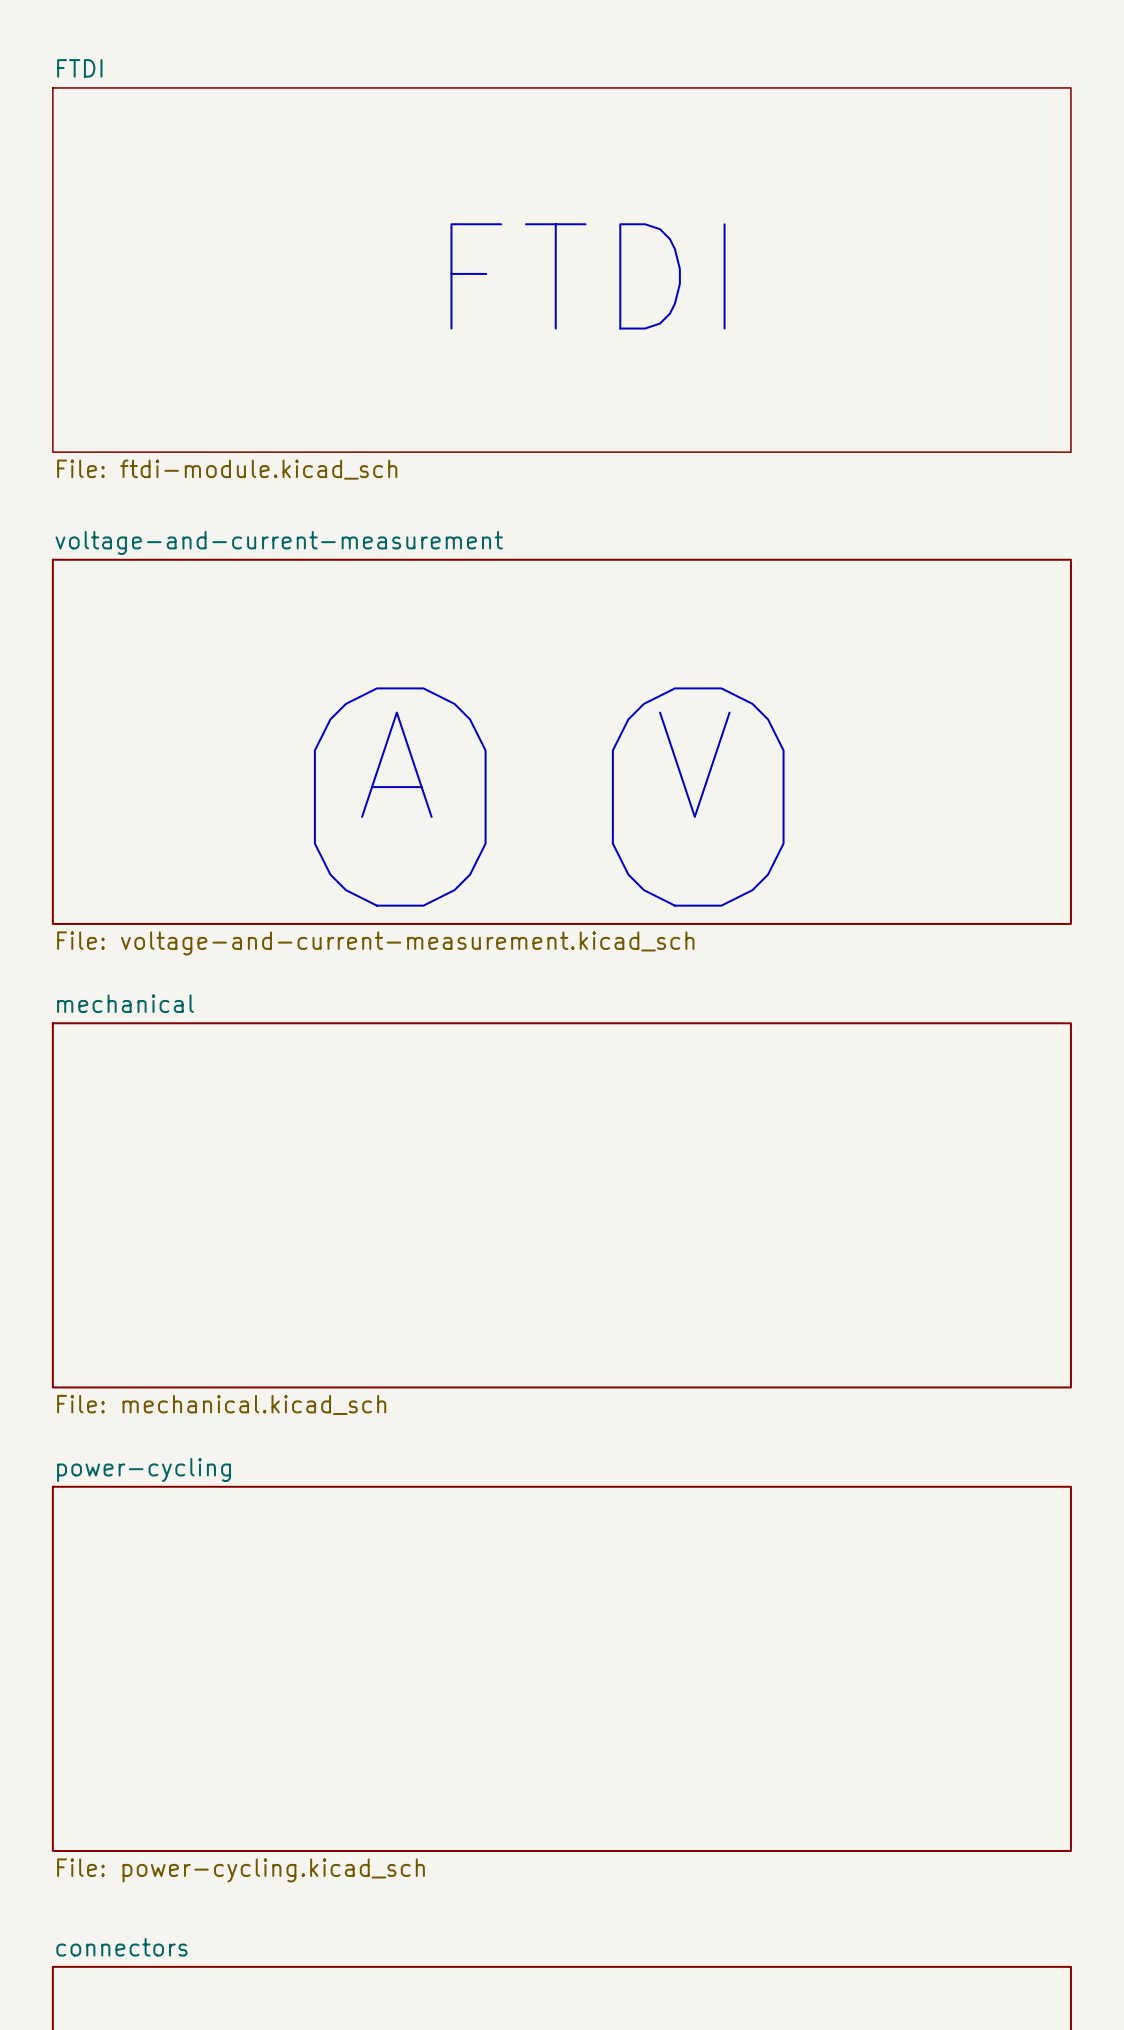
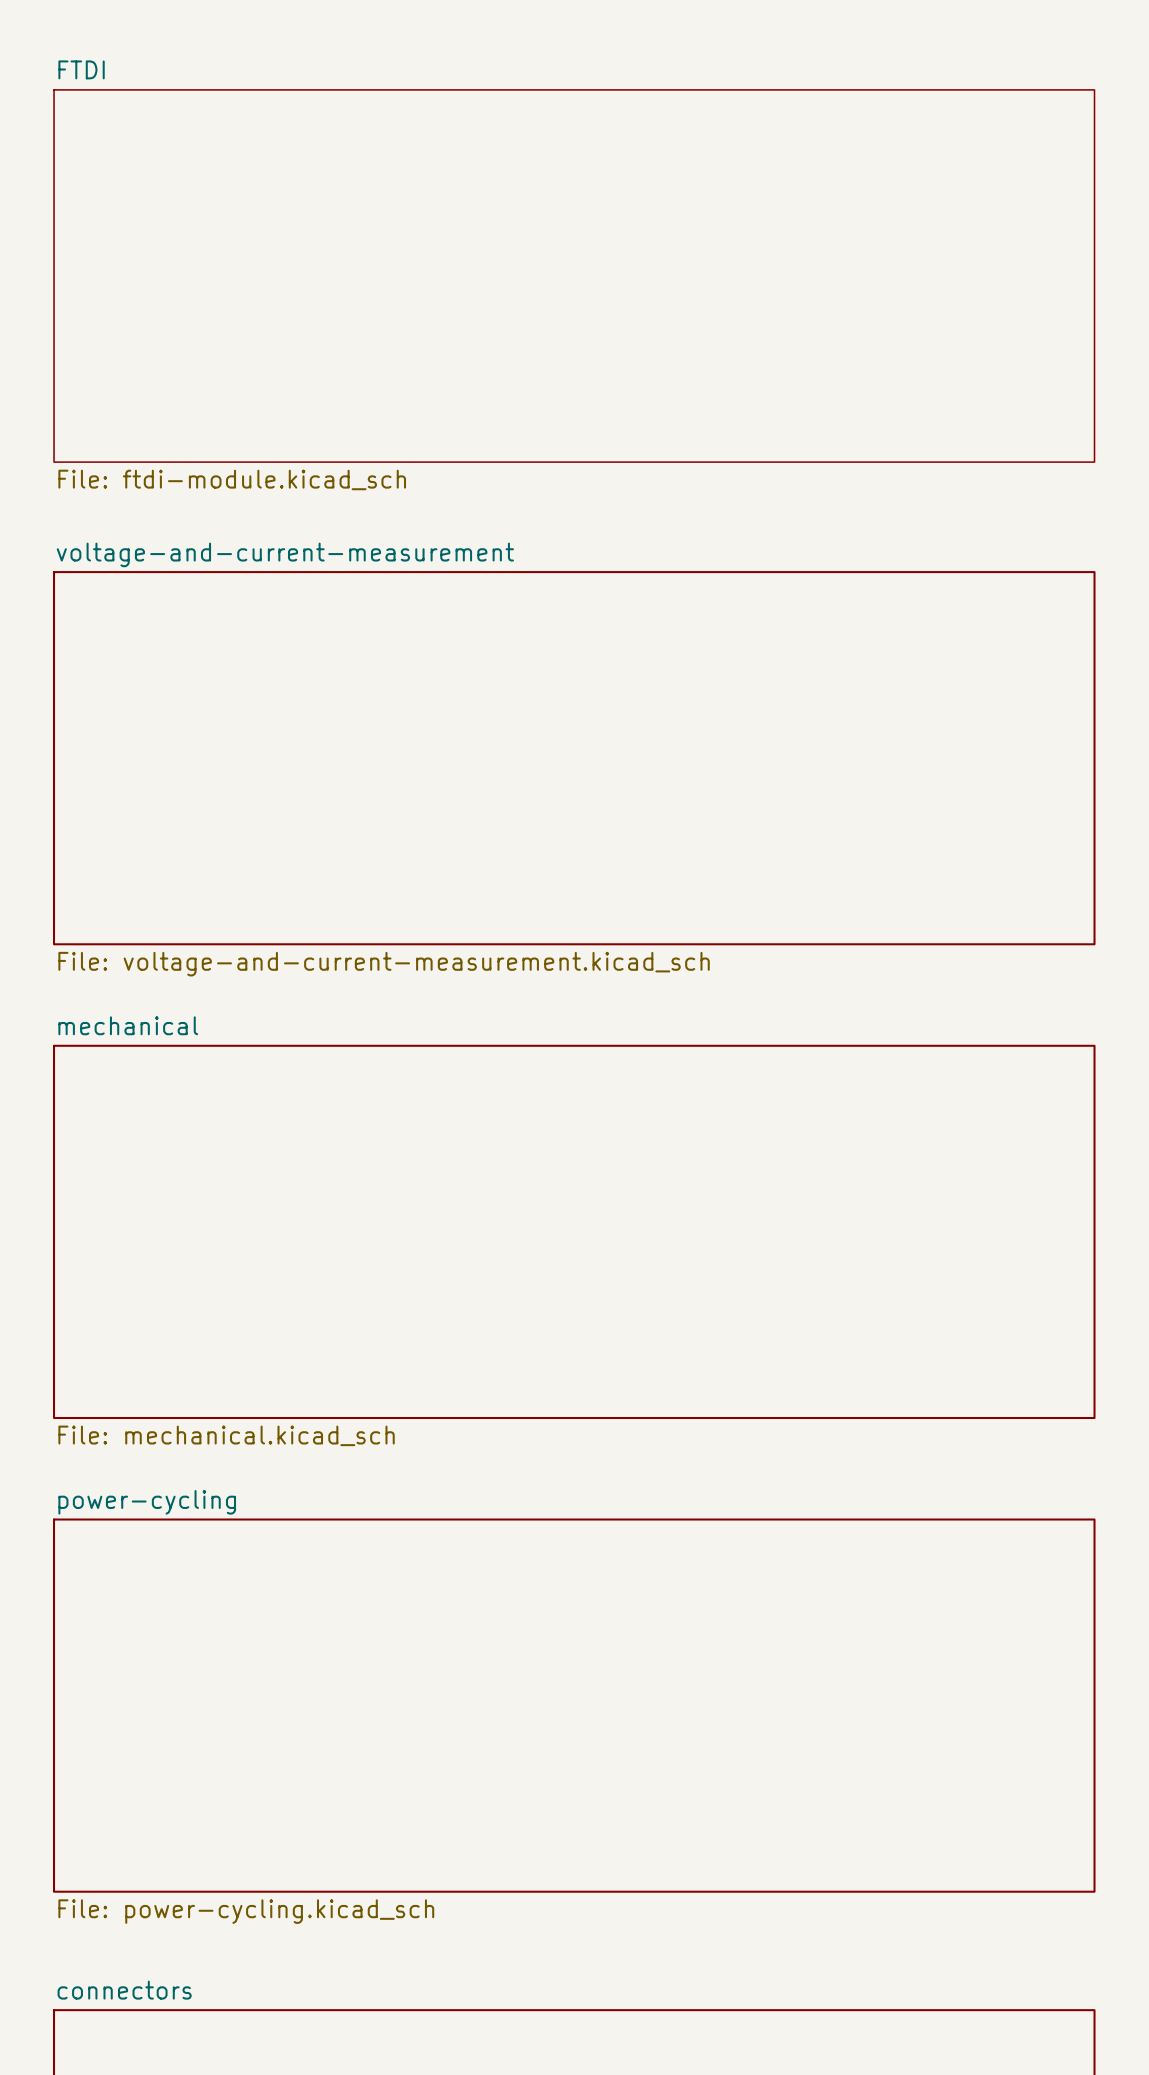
text: FTDI (588, 276) -> none
text: A (396, 764) -> none
text: V (694, 764) -> none
text: o (400, 797) -> none
text: o (698, 797) -> none

